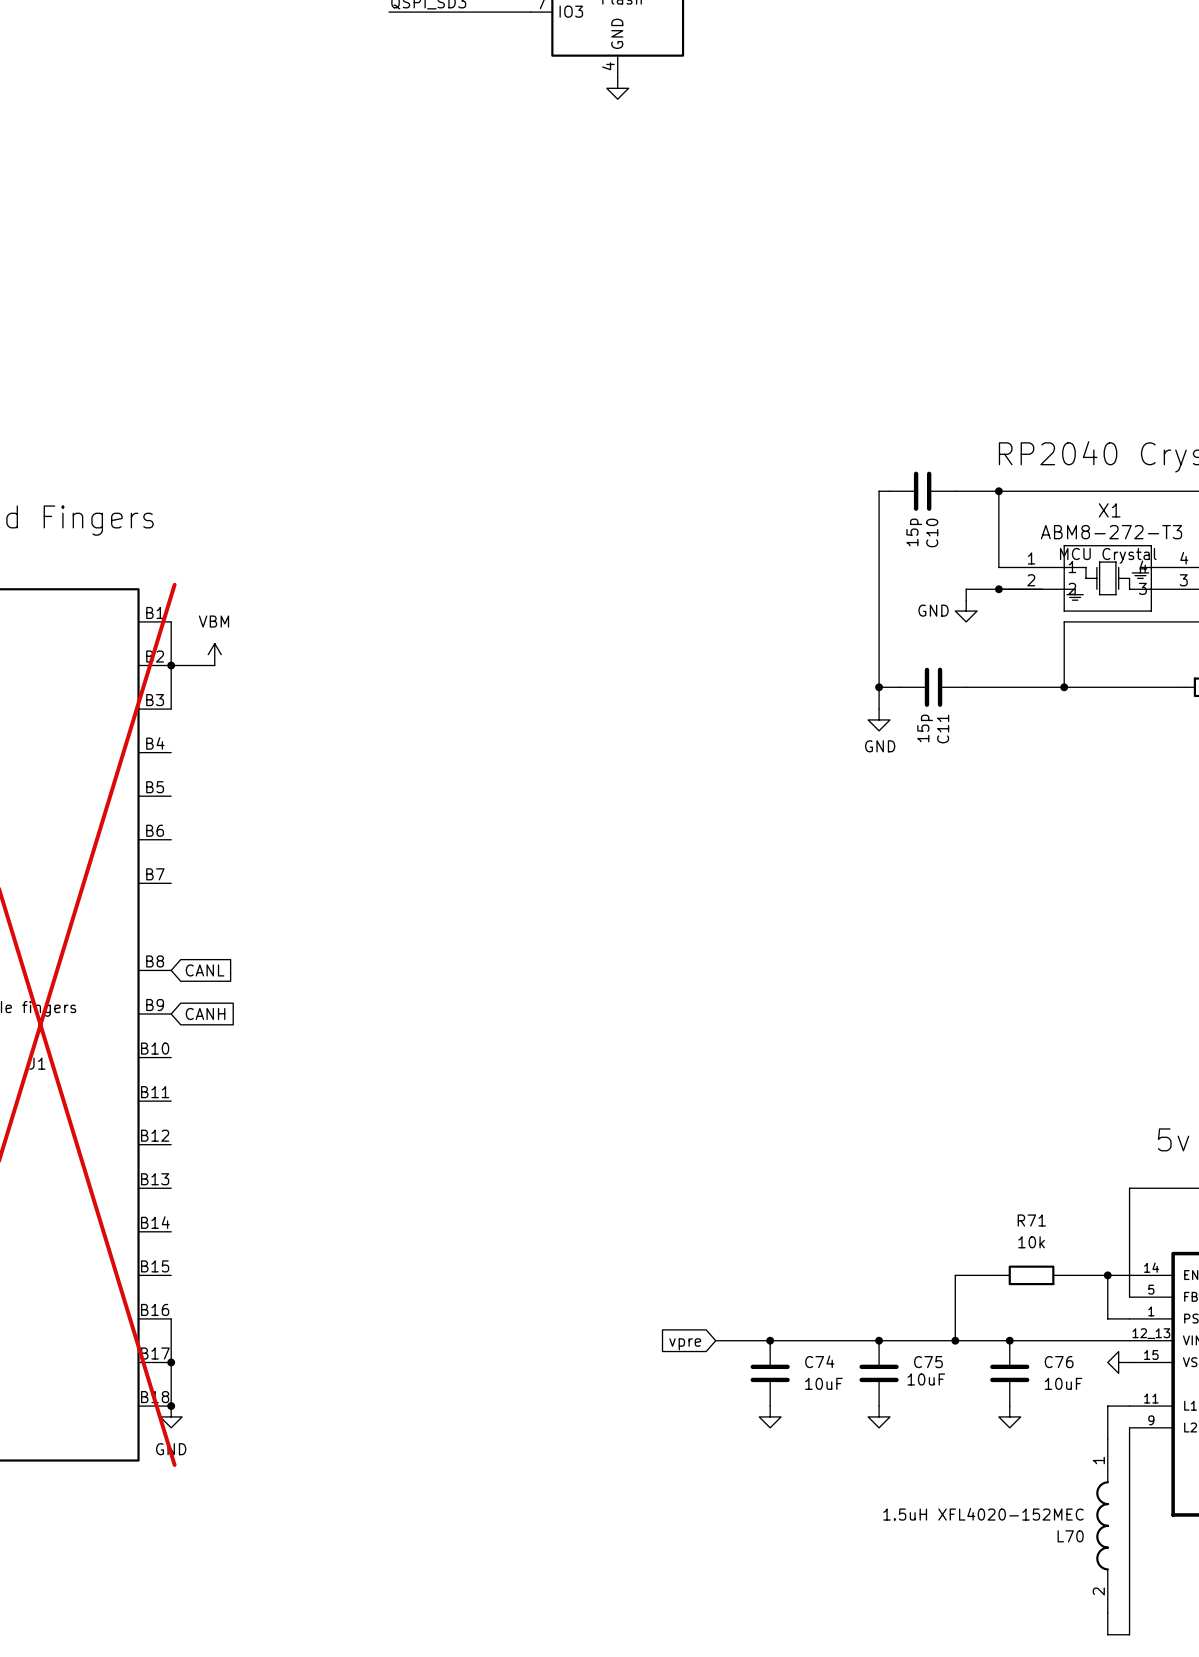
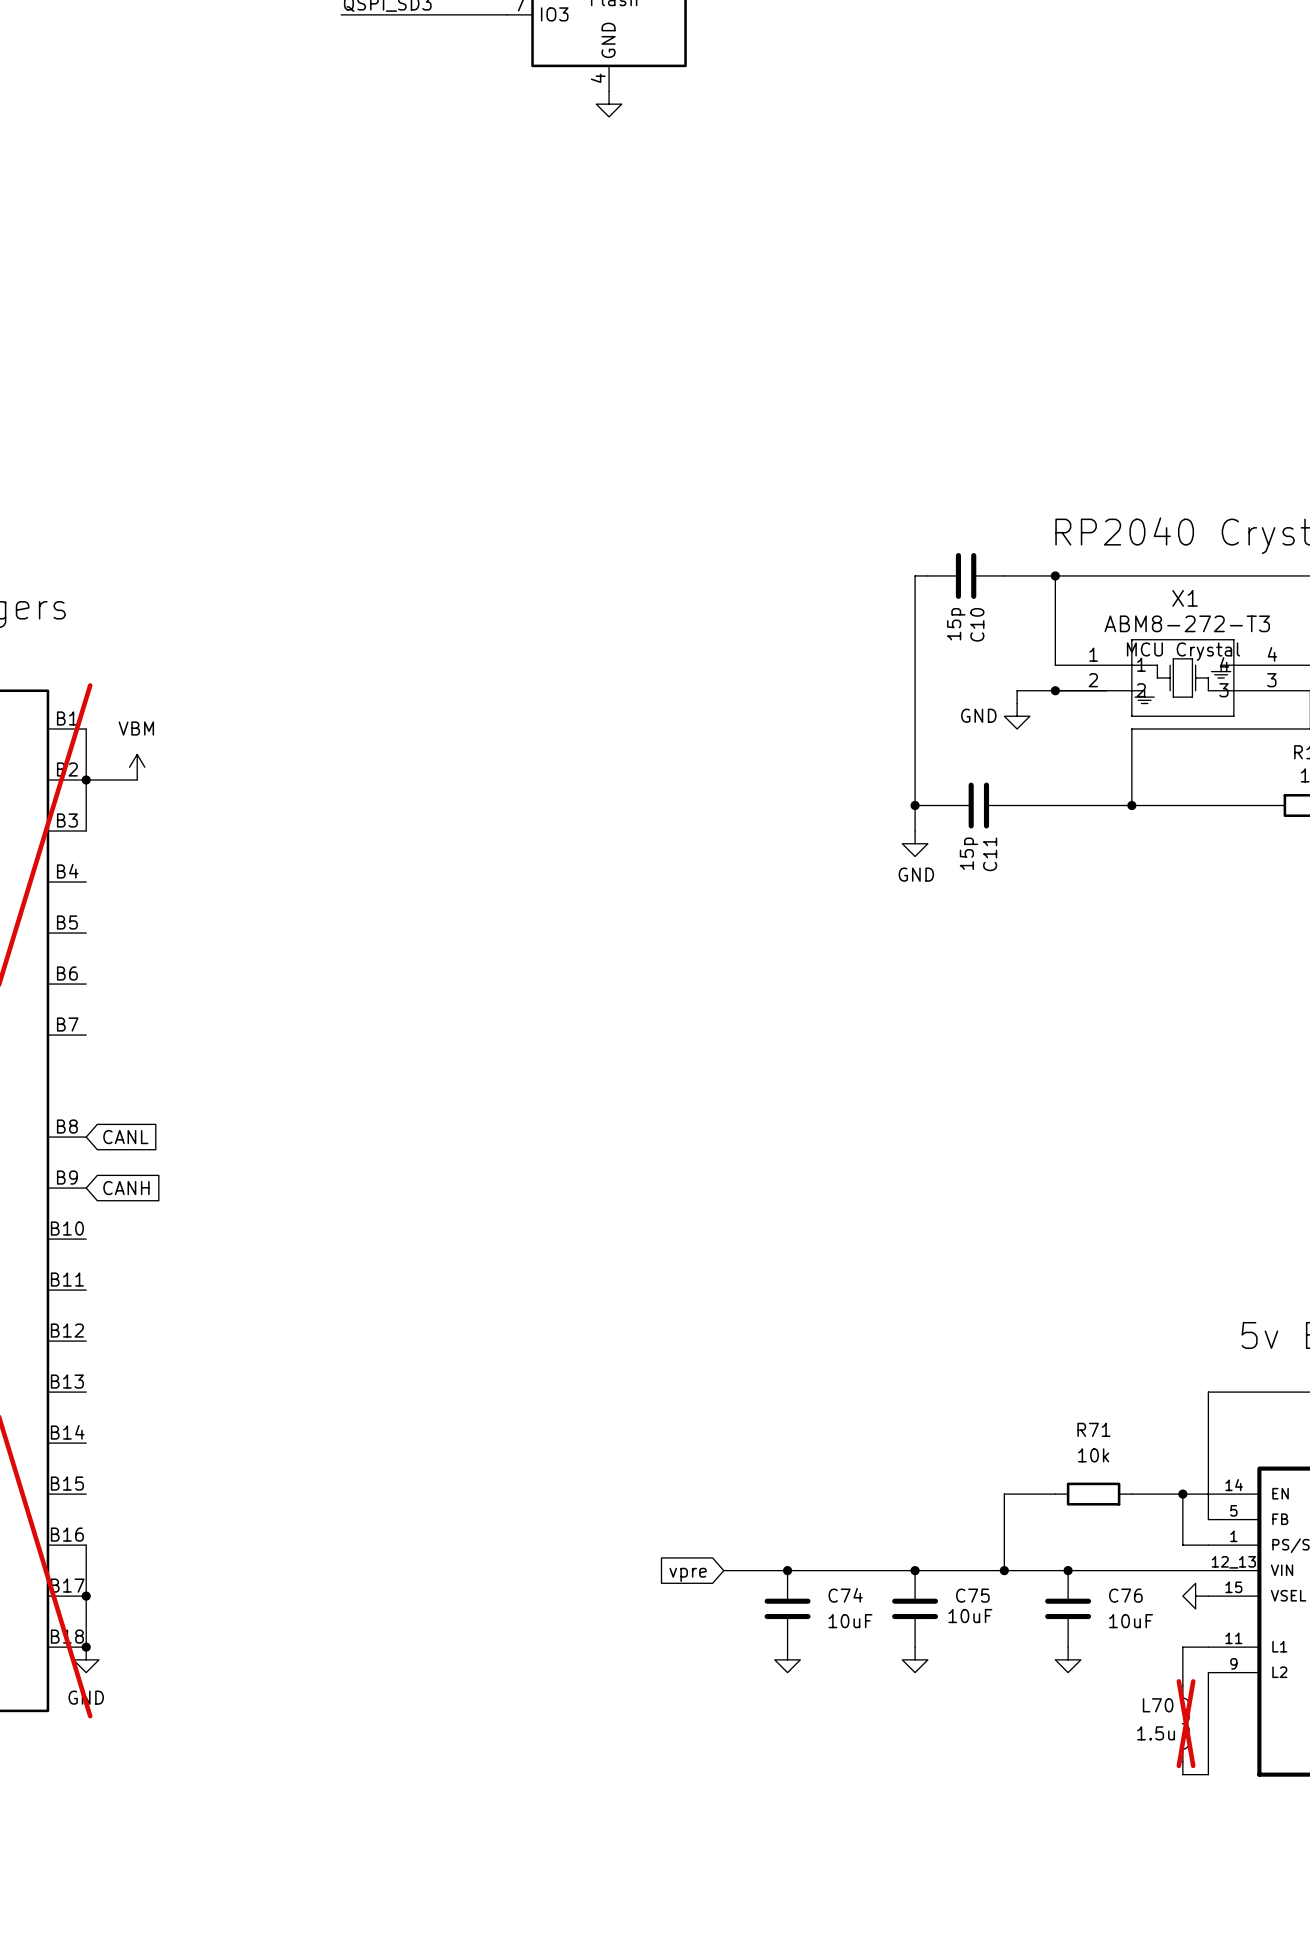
L70 symbol: [1096, 1438, 1109, 1613] -> [1182, 1685, 1190, 1762]
L70 do-not-place cross: none -> (1186, 1723)
L70 value: 1.5uH XFL4020-152MEC (983, 1514) -> 1.5u (1156, 1733)
wire: (1129, 1514) (1129, 1634) (1107, 1634) (1107, 1612) -> (1208, 1774) (1182, 1774) (1182, 1761)
L70 name position: L70 (1070, 1536) -> L70 (1158, 1705)

